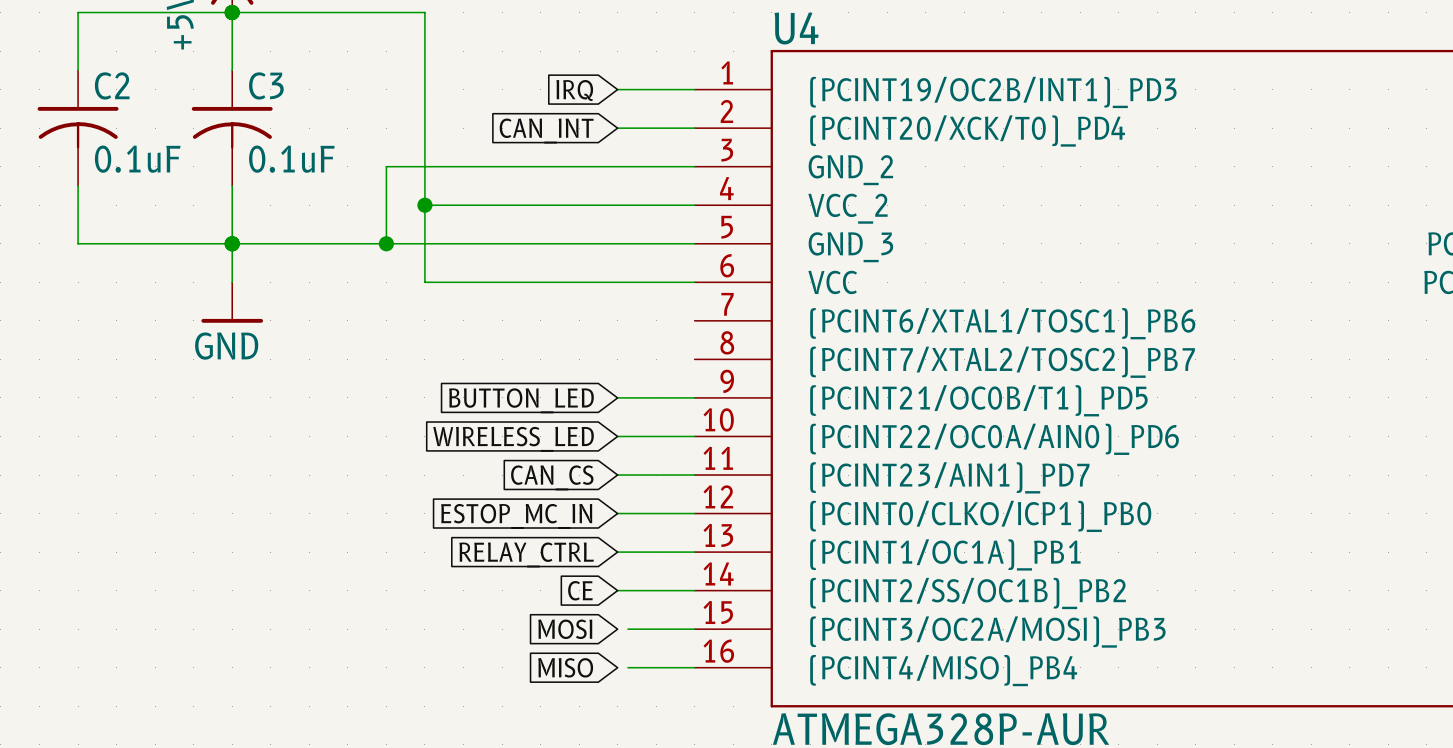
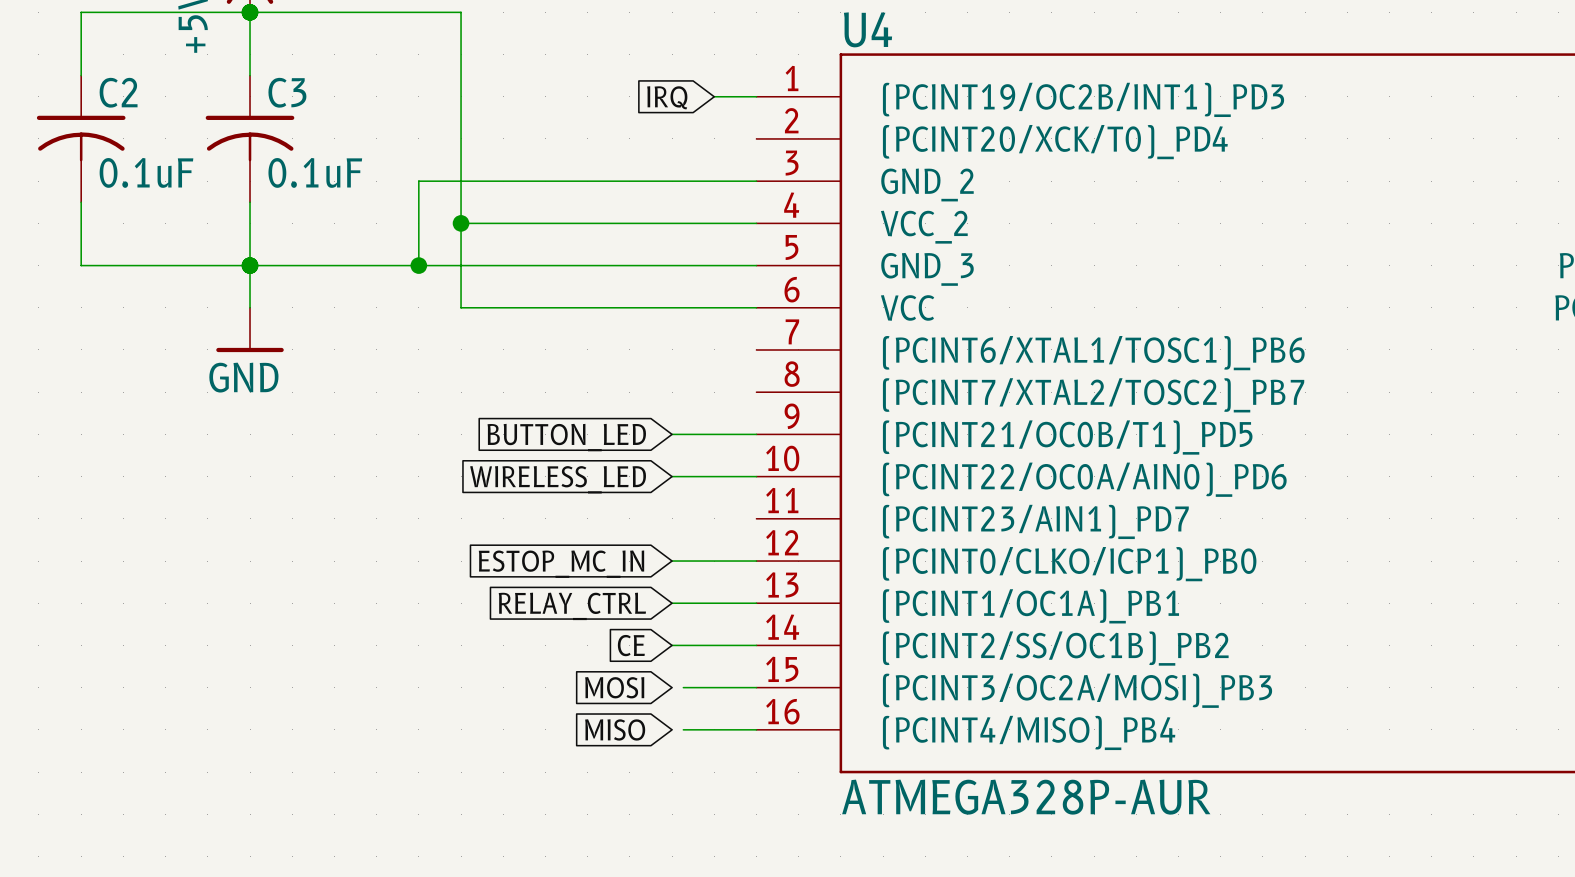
wire: (617, 89) (656, 89) -> none
global label position: IRQ (574, 90) -> IRQ (667, 97)
wire: (617, 128) (694, 128) -> none
global label: CAN_INT (546, 131) -> none
wire: (617, 475) (694, 475) -> none
global label: CAN_CS (552, 477) -> none

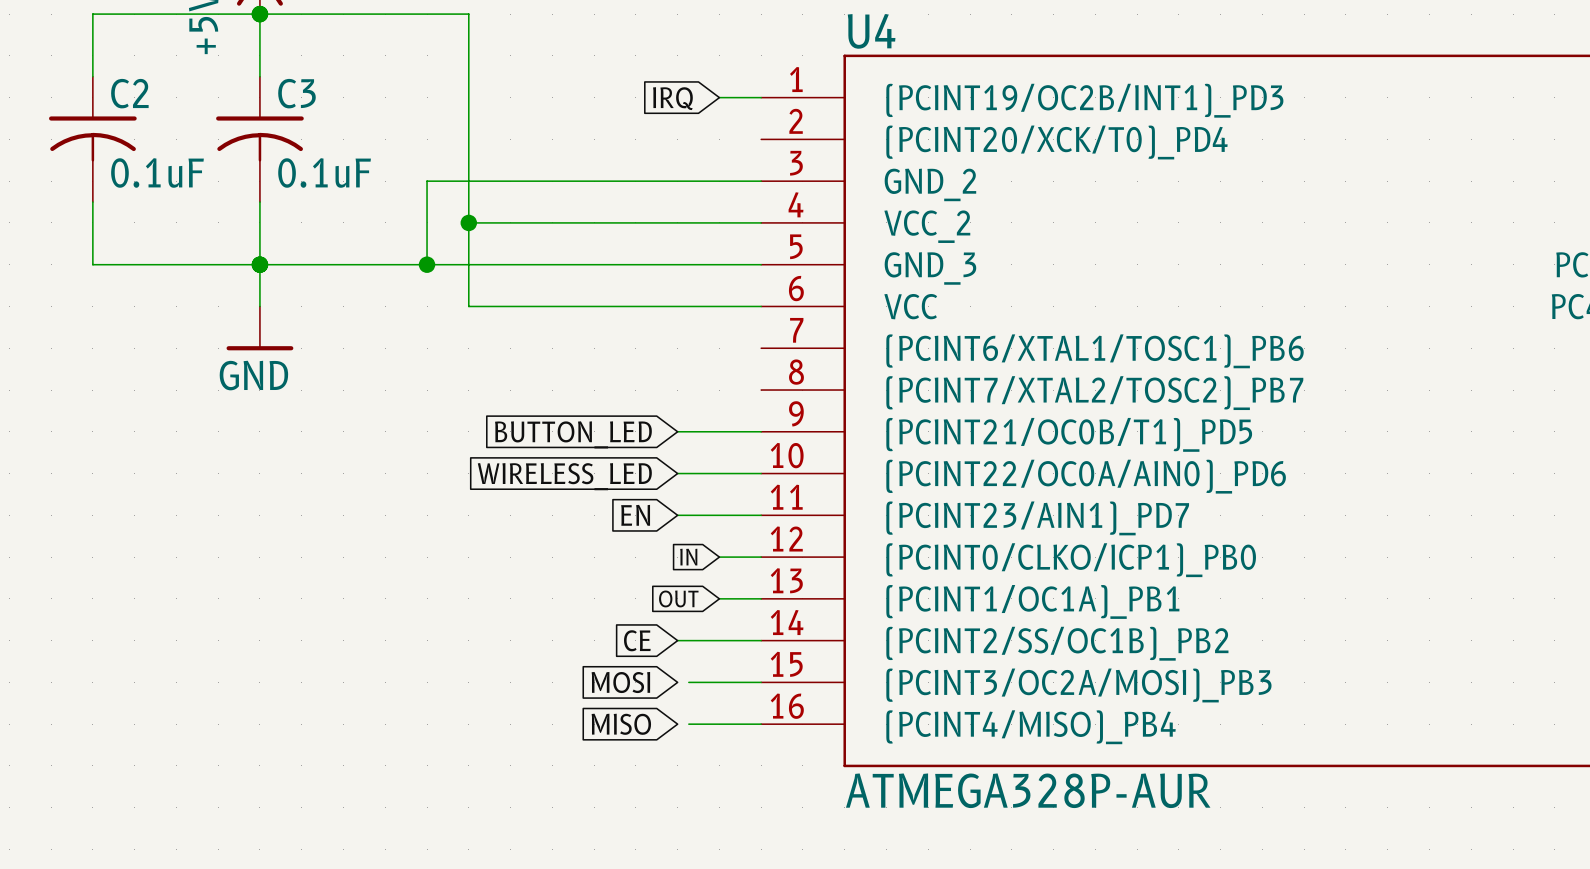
global label: none -> EN (635, 515)
wire: none -> (677, 515) (761, 515)
wire: (672, 561) (714, 561) -> none
global label: none -> IN (688, 557)
global label: ESTOP_MC_IN (561, 564) -> none
wire: (672, 603) (714, 603) -> none
global label: none -> OUT (678, 598)
global label: RELAY_CTRL (572, 606) -> none

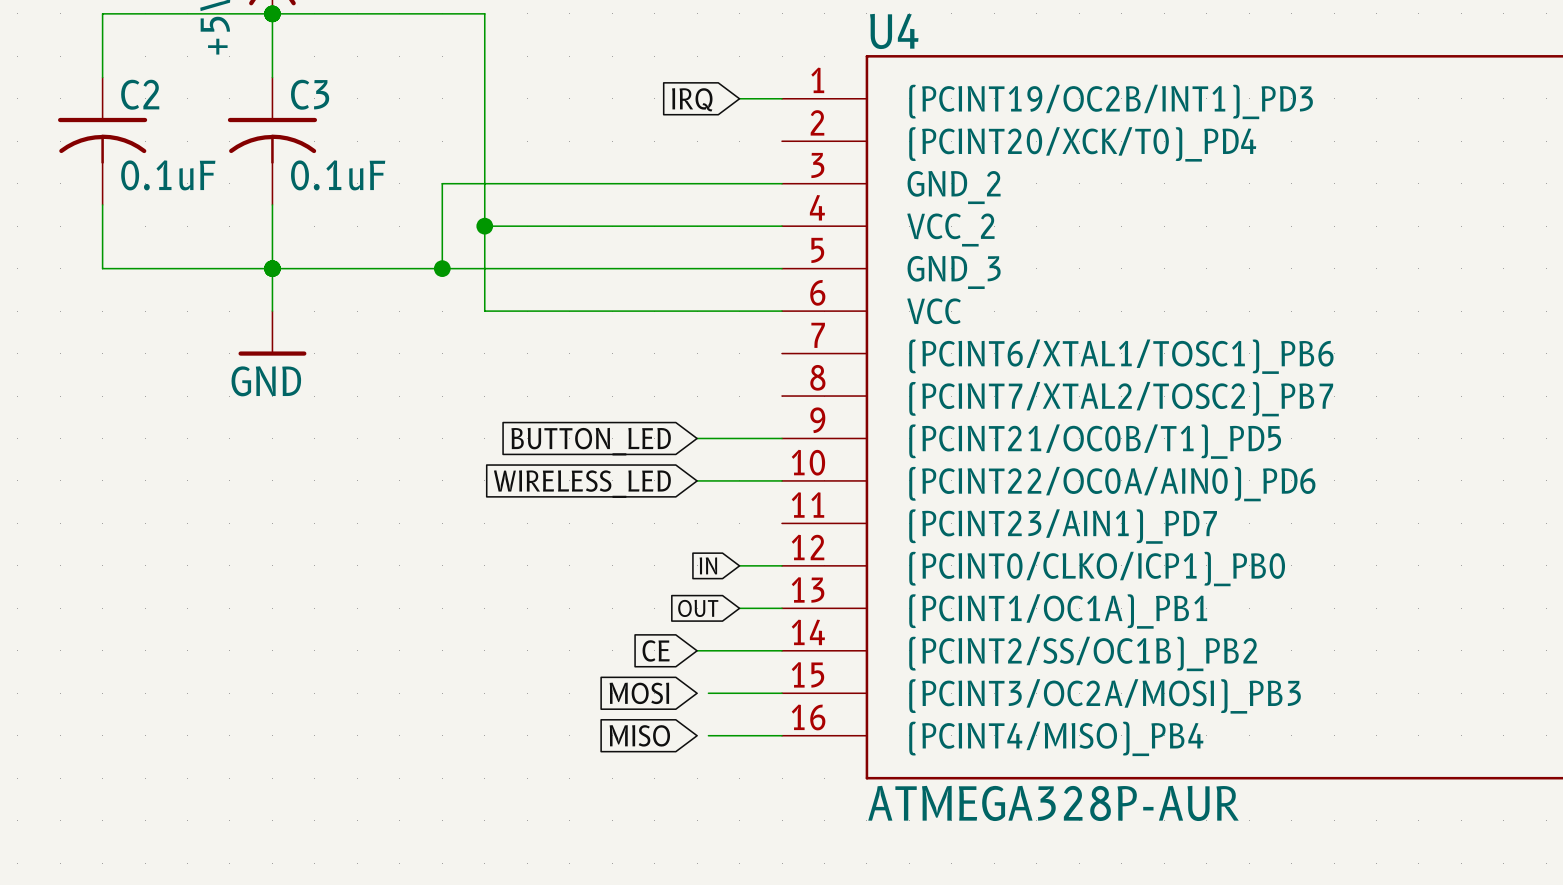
global label: EN (635, 515) -> none
wire: (677, 515) (761, 515) -> none

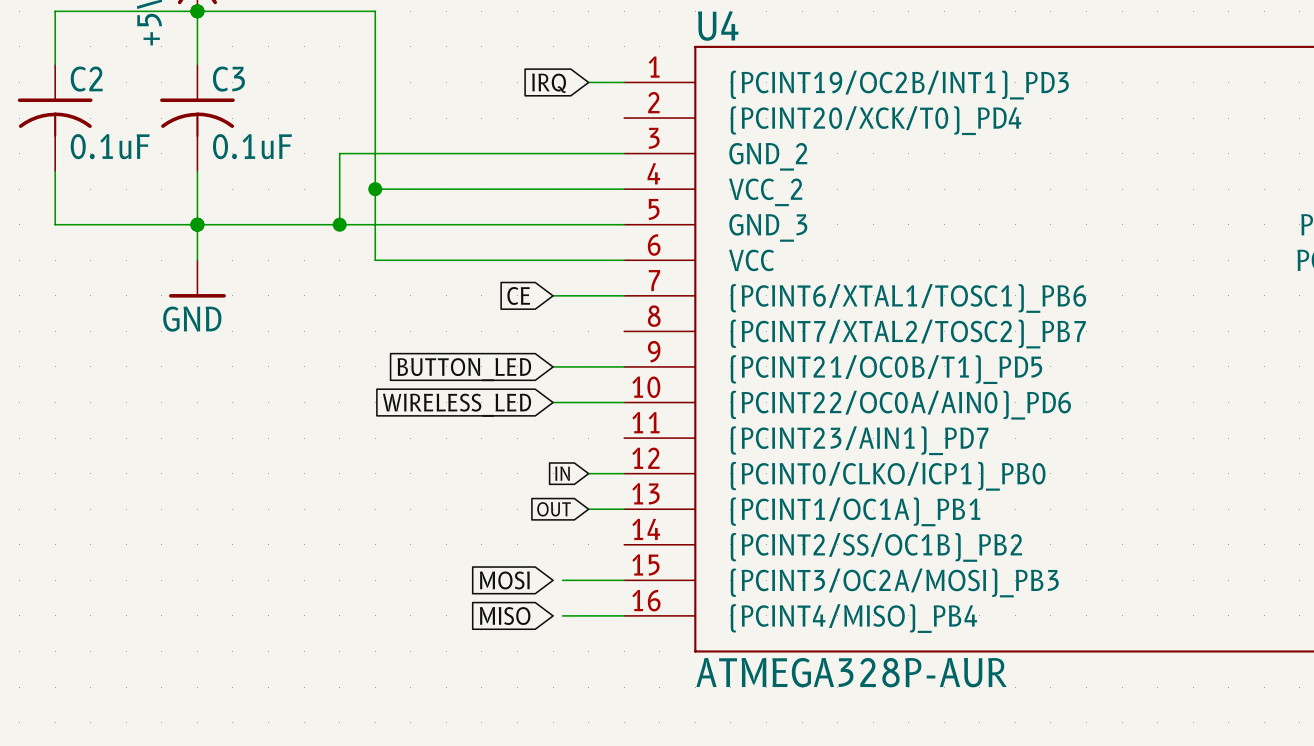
global label position: CE (656, 650) -> CE (518, 295)
wire: (697, 650) (782, 650) -> (553, 295) (624, 295)

